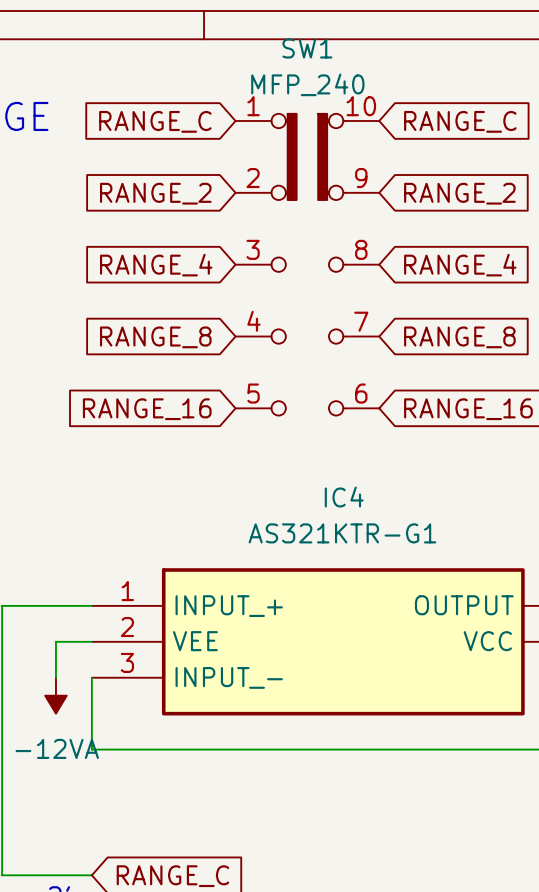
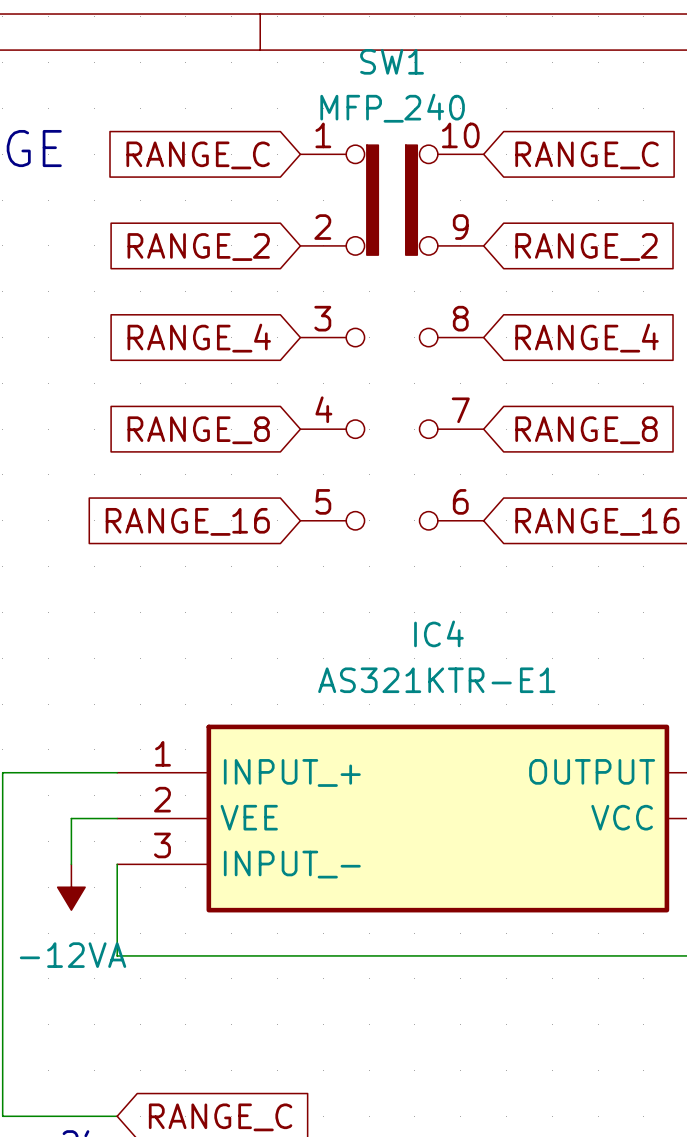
IC4 value: AS321KTR-G1 (342, 533) -> AS321KTR-E1 (436, 680)

